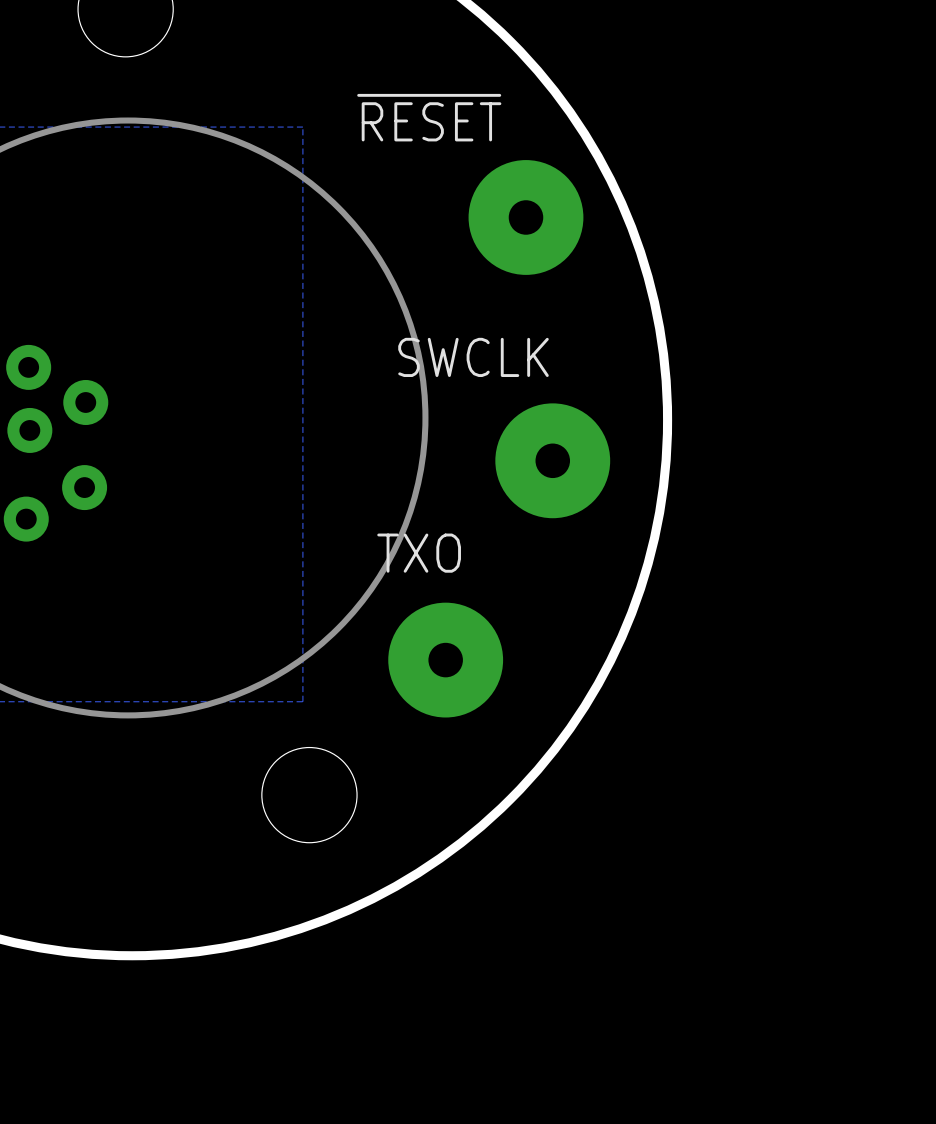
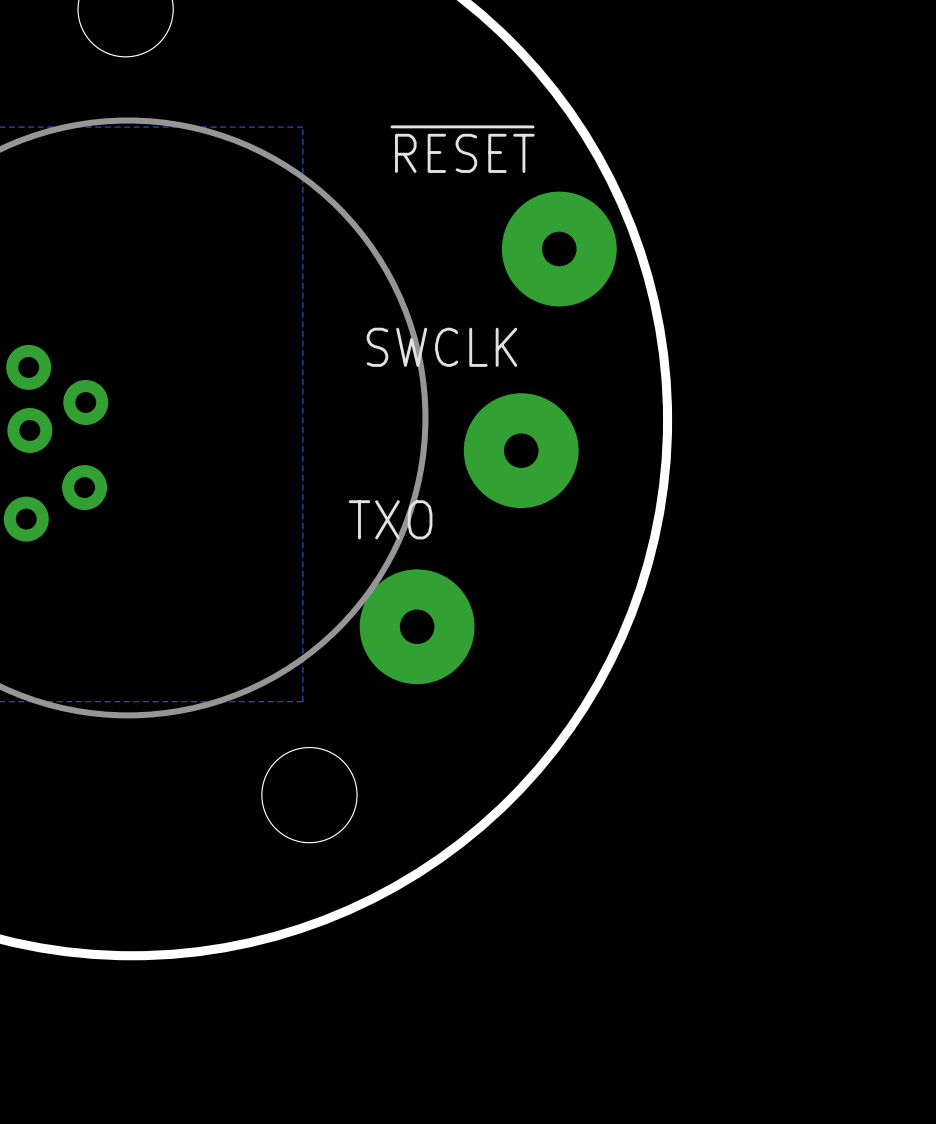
~{RESET} position: (525, 217) -> (559, 249)
SWCLK position: (552, 460) -> (521, 450)
TXO position: (445, 660) -> (417, 626)

